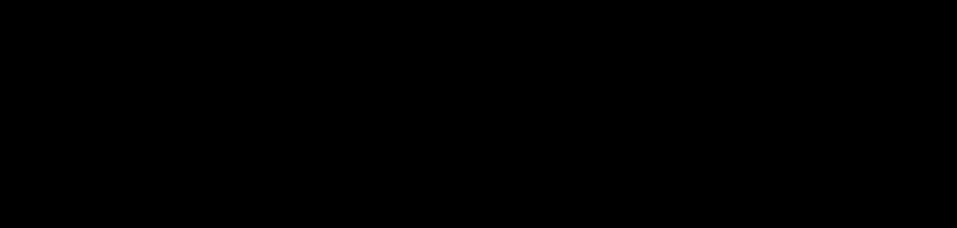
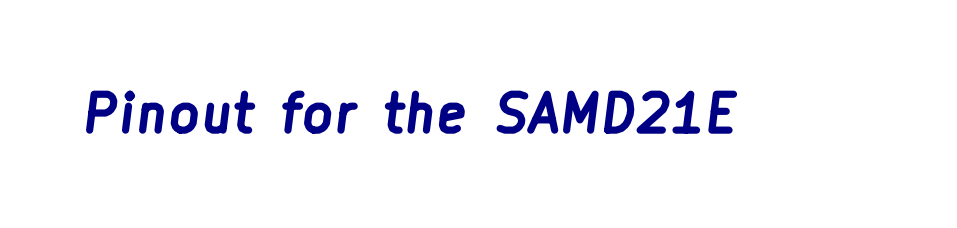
text: none -> Pinout for the SAMD21E (411, 112)

